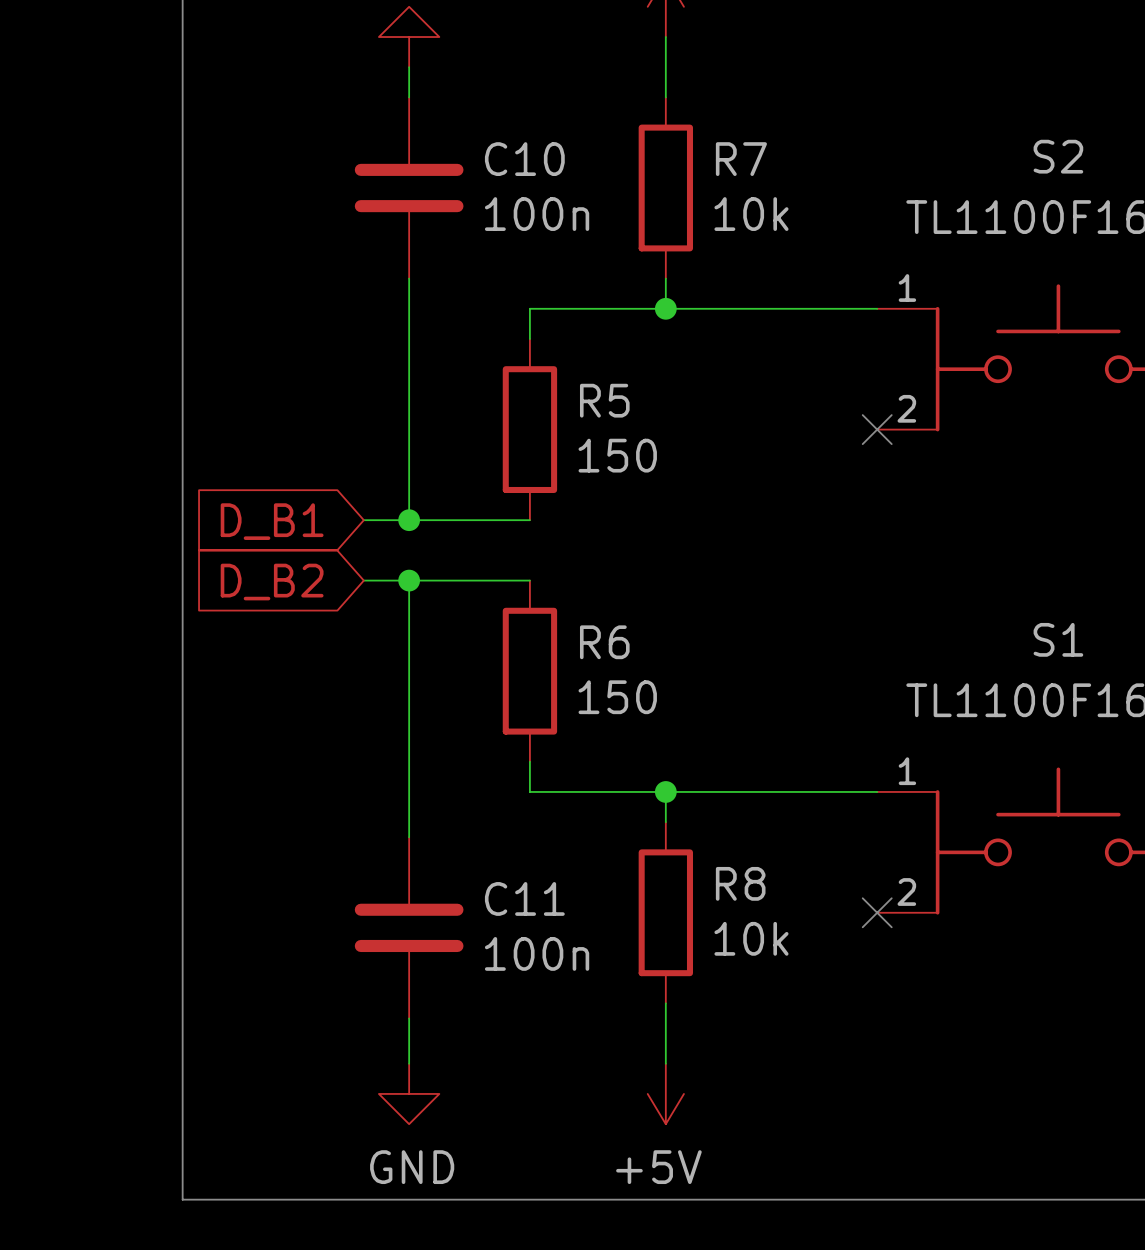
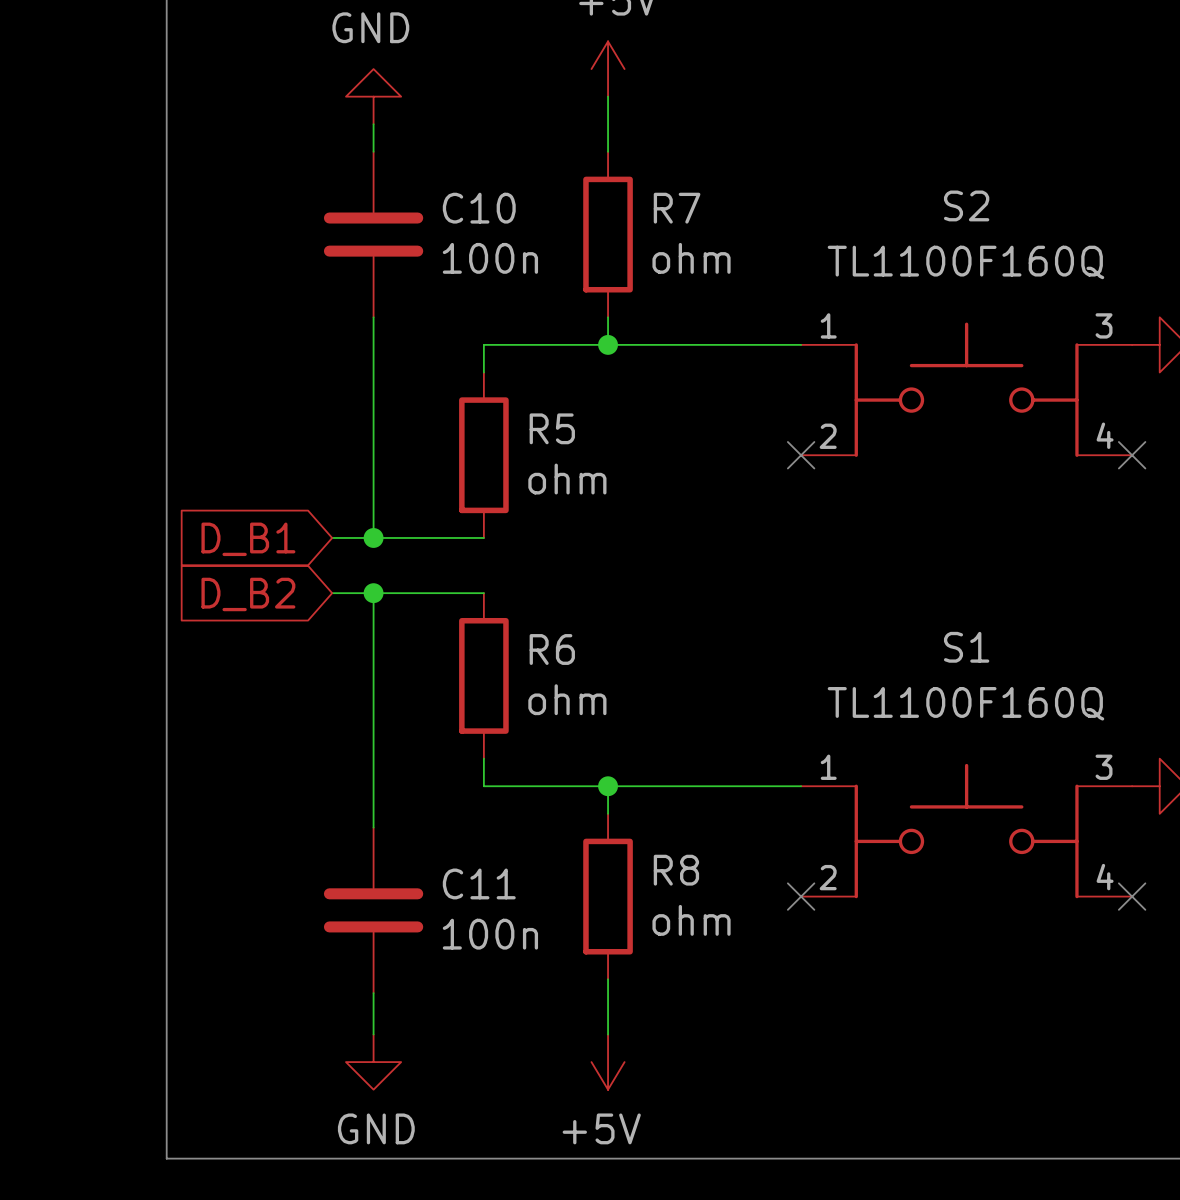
R7 value: 10k (751, 214) -> ohm (691, 258)
R5 value: 150 (617, 455) -> ohm (567, 479)
R6 value: 150 (617, 697) -> ohm (567, 699)
R8 value: 10k (751, 938) -> ohm (691, 920)

